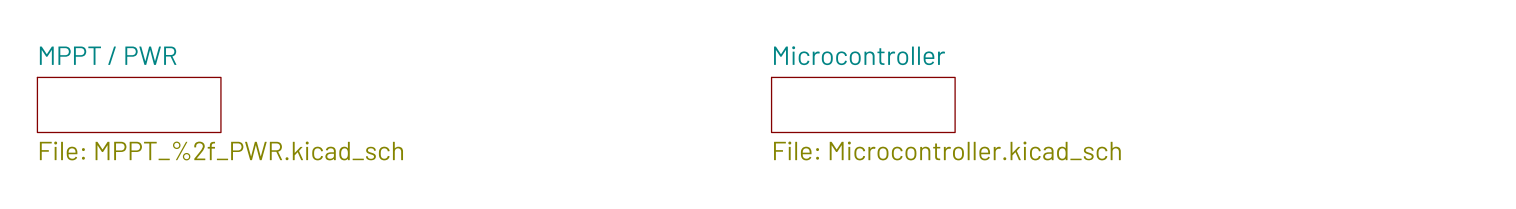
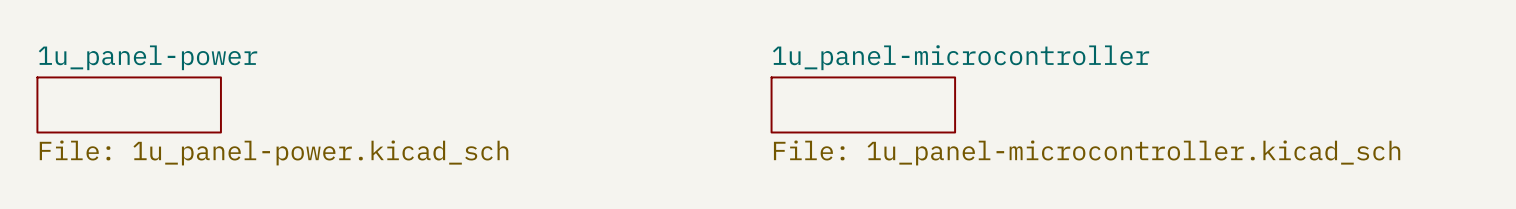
sheet MPPT / PWR name: MPPT / PWR (108, 55) -> 1u_panel-power (148, 57)
sheet Microcontroller name: Microcontroller (859, 55) -> 1u_panel-microcontroller (961, 57)
sheet MPPT / PWR value: File: MPPT_%2f_PWR.kicad_sch (221, 150) -> File: 1u_panel-power.kicad_sch (274, 152)
sheet Microcontroller value: File: Microcontroller.kicad_sch (947, 150) -> File: 1u_panel-microcontroller.kicad_sch (1087, 152)

